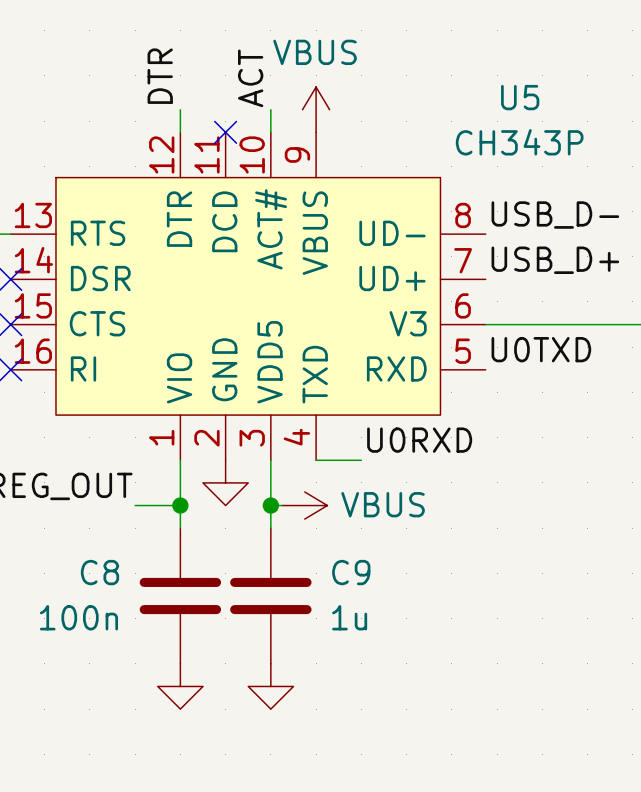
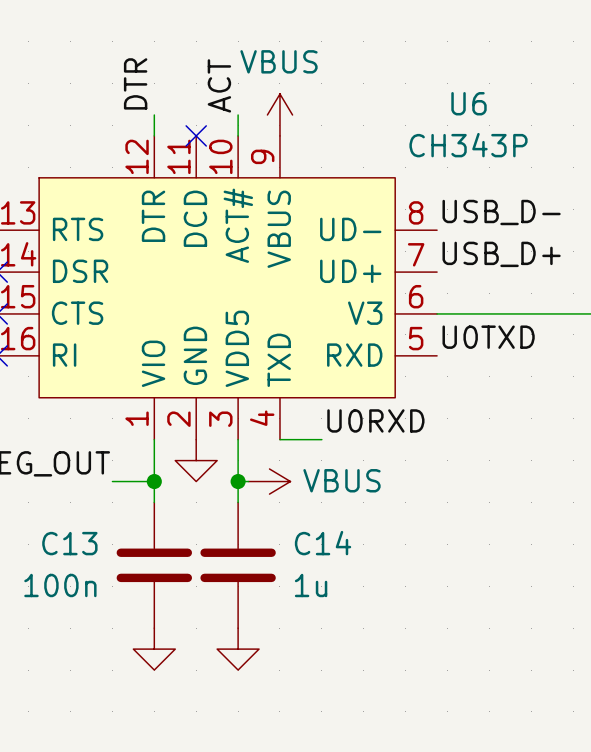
U5 name: U5 (520, 97) -> U6 (469, 103)
C8 name: C8 (99, 572) -> C13 (69, 543)
C9 name: C9 (351, 572) -> C14 (323, 543)

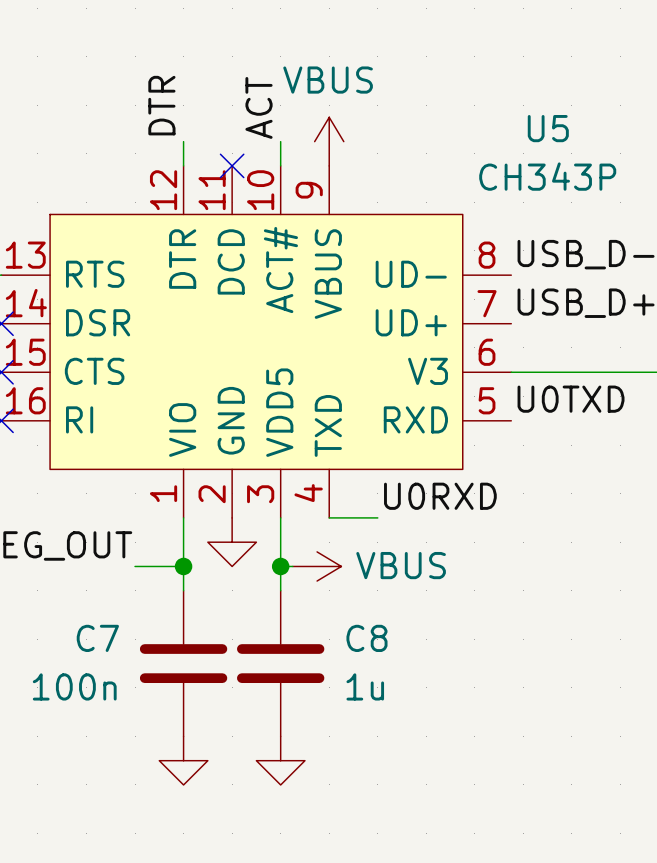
U6 name: U6 (469, 103) -> U5 (548, 128)
C13 name: C13 (69, 543) -> C7 (97, 638)
C14 name: C14 (323, 543) -> C8 (366, 638)

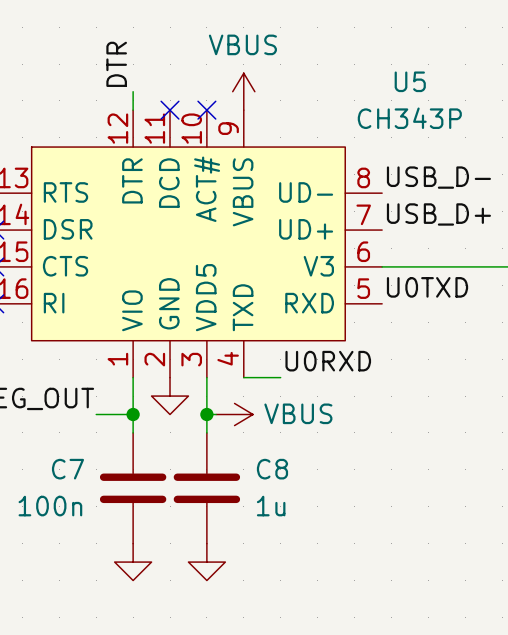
label: ACT (259, 107) -> none
wire: (280, 141) (280, 165) -> none
no-connect mark: none -> (206, 110)

